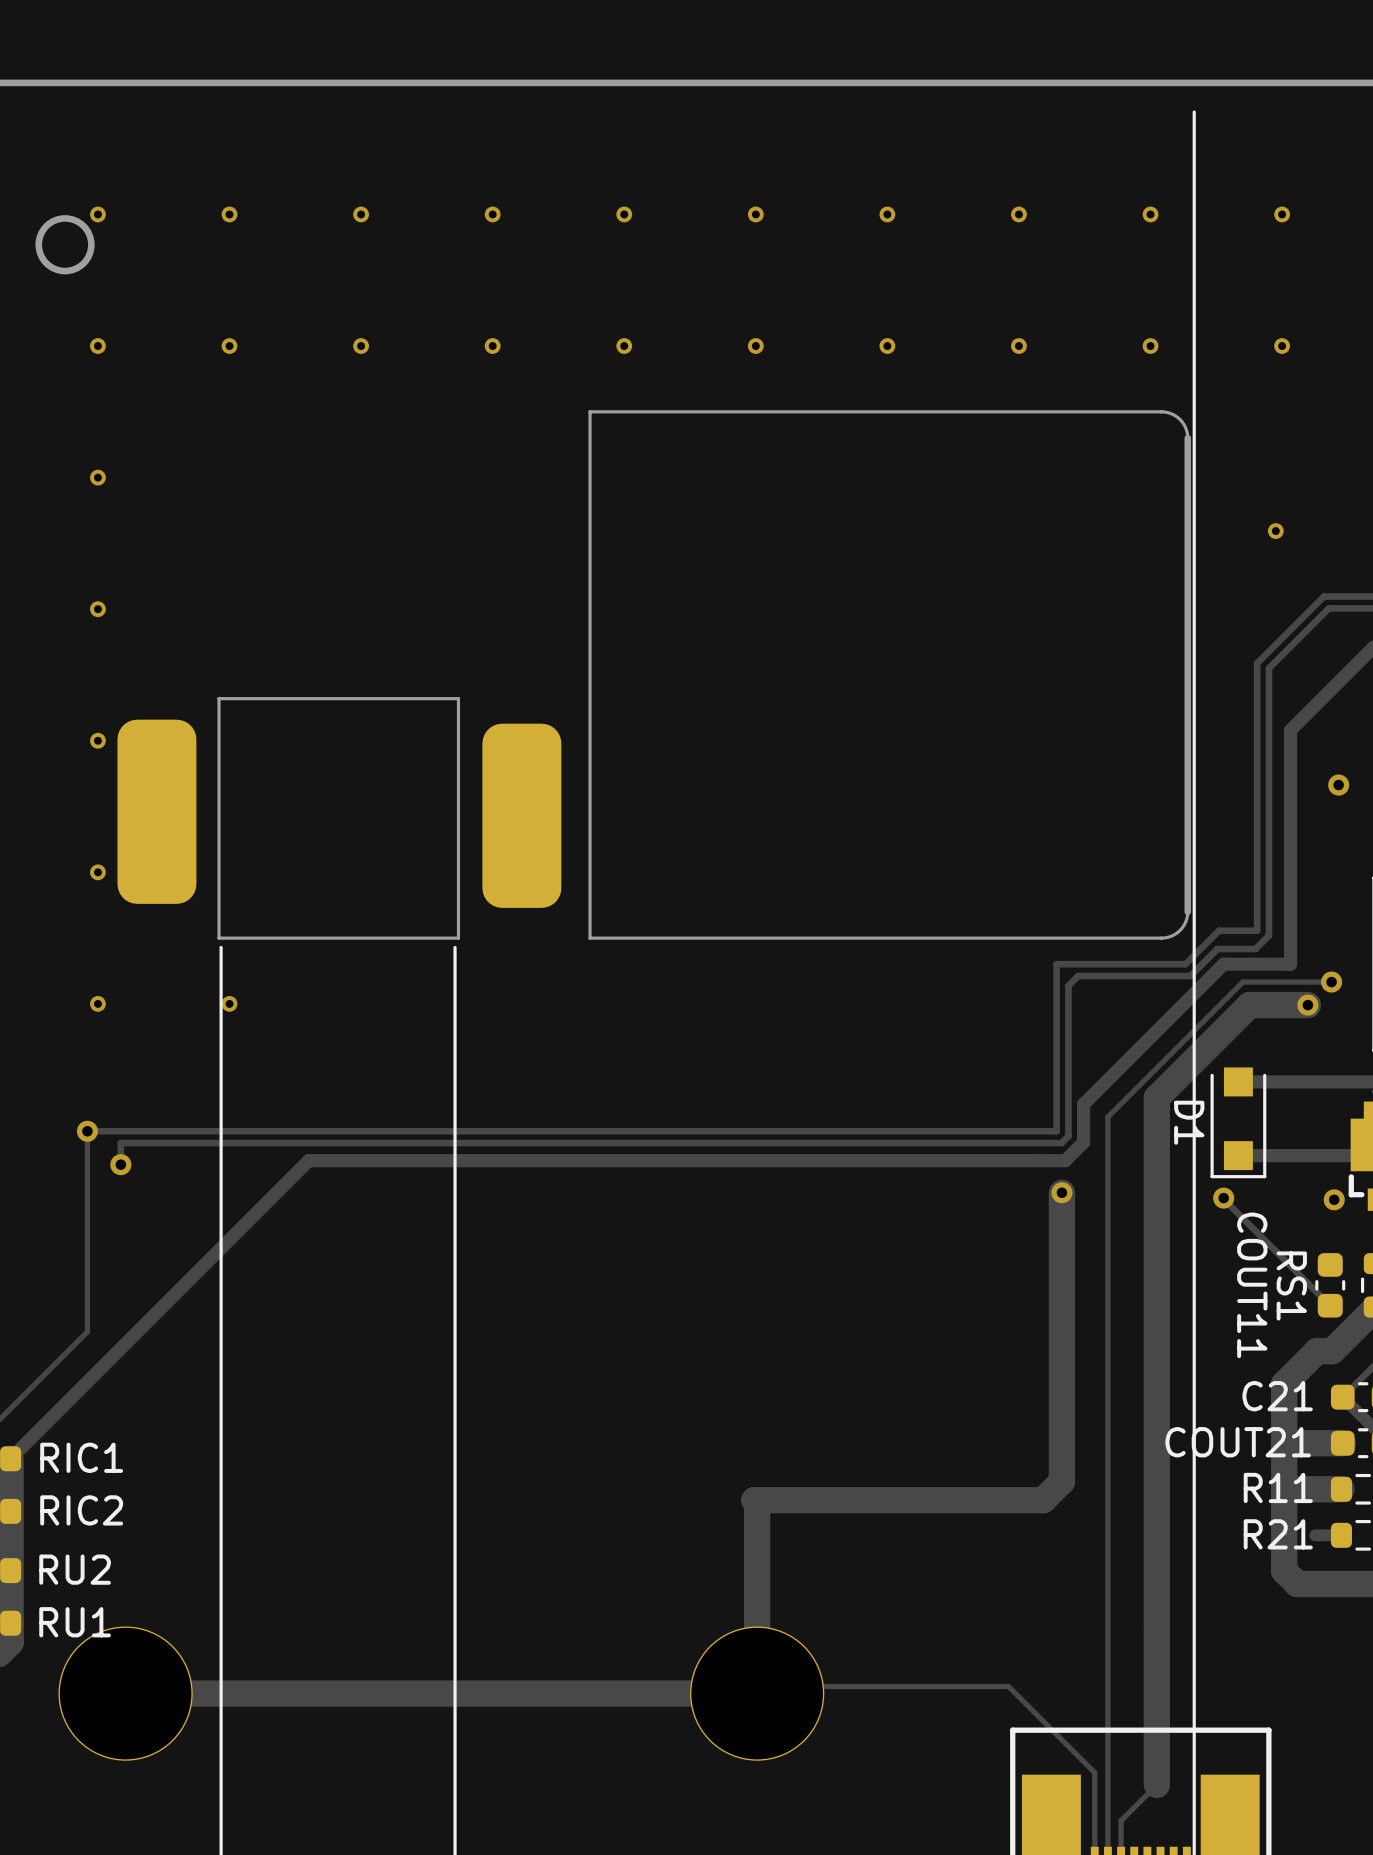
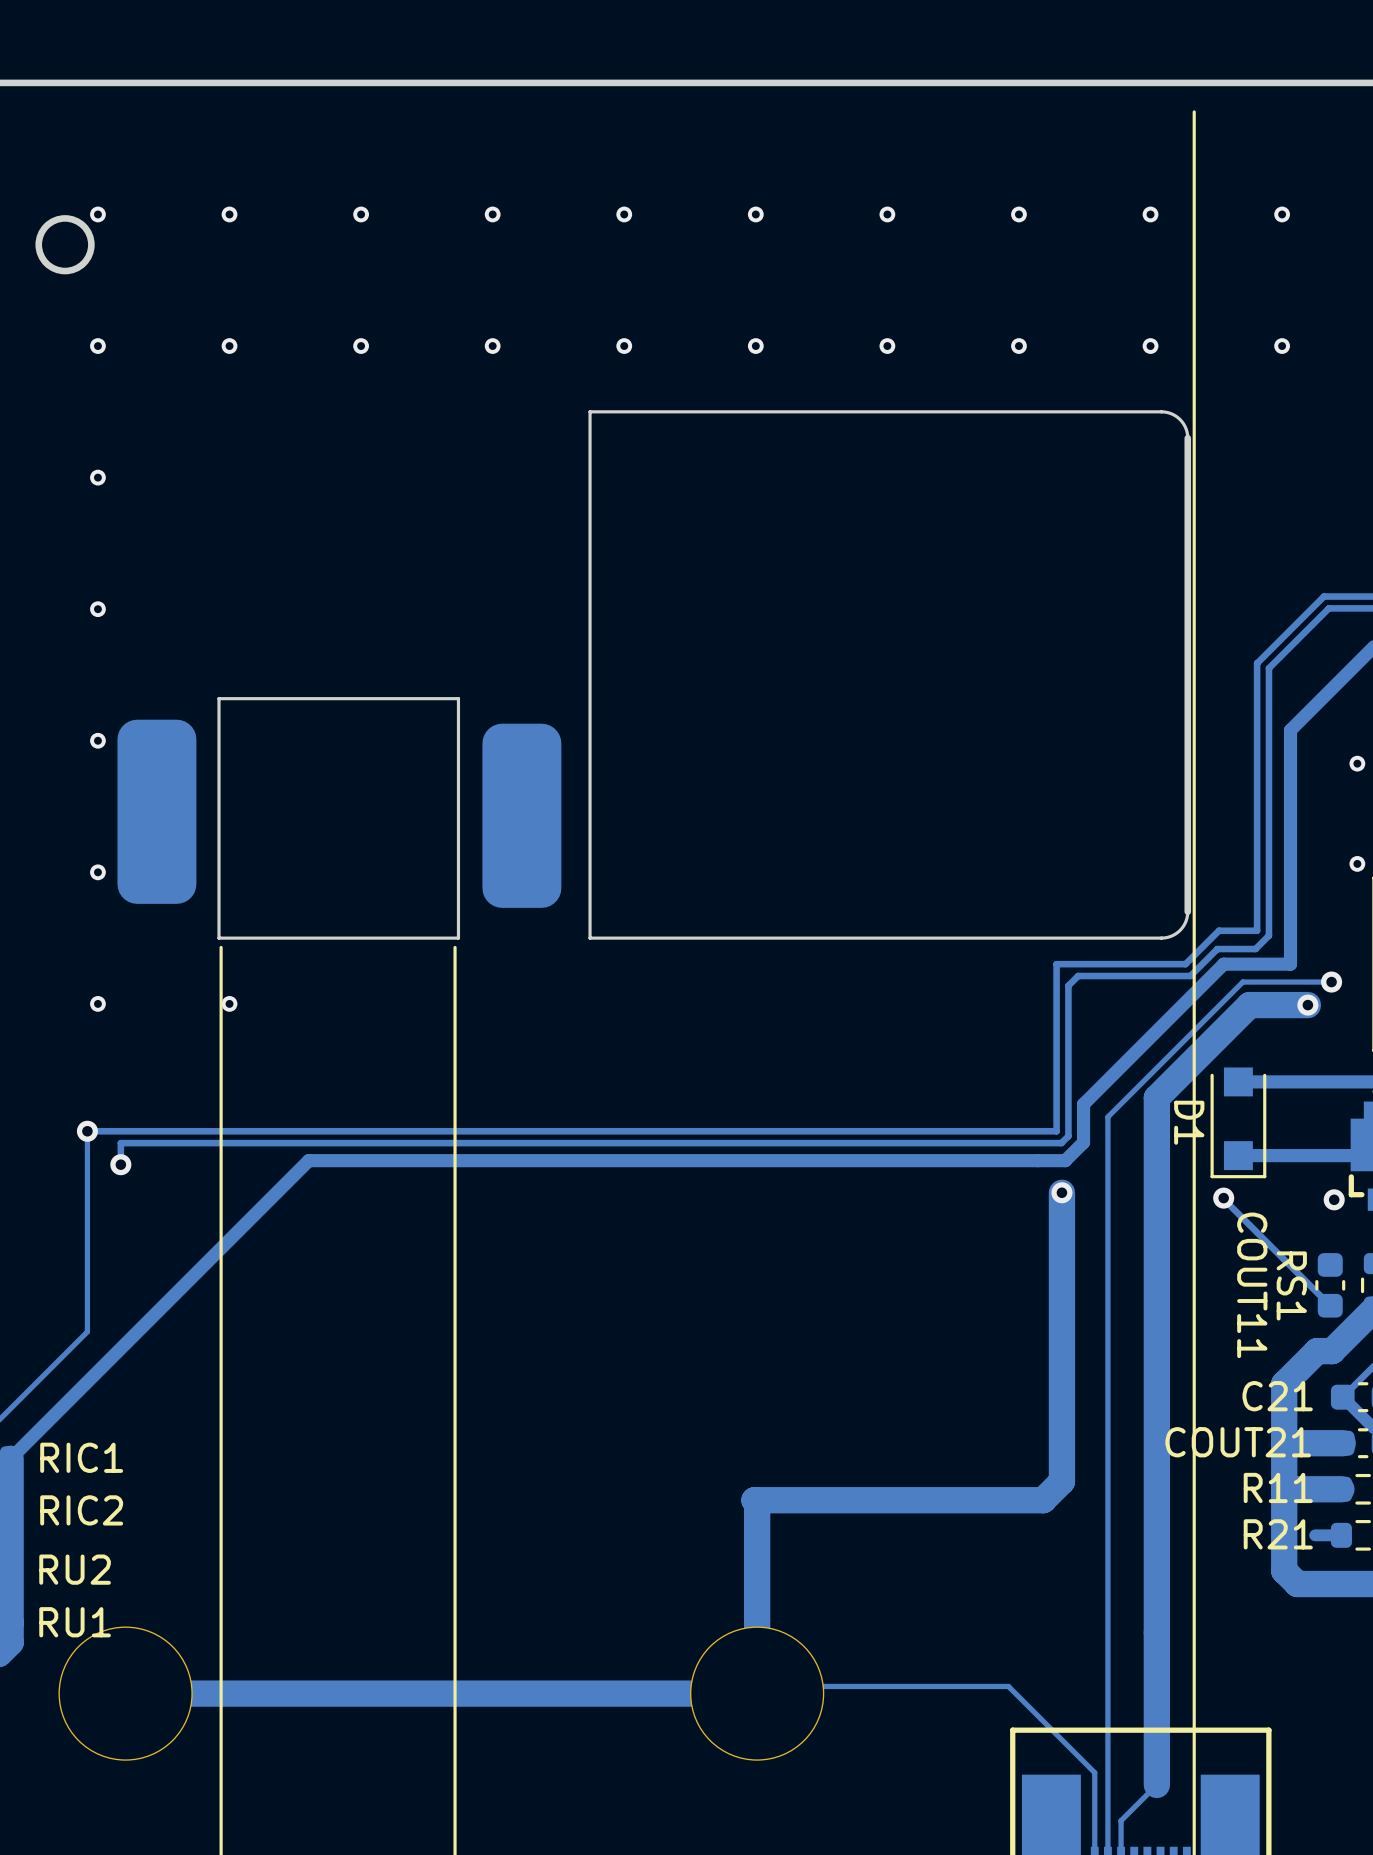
via: (1275, 531) -> none
via: none -> (1357, 763)
via: (1338, 785) -> none
via: none -> (1357, 863)

